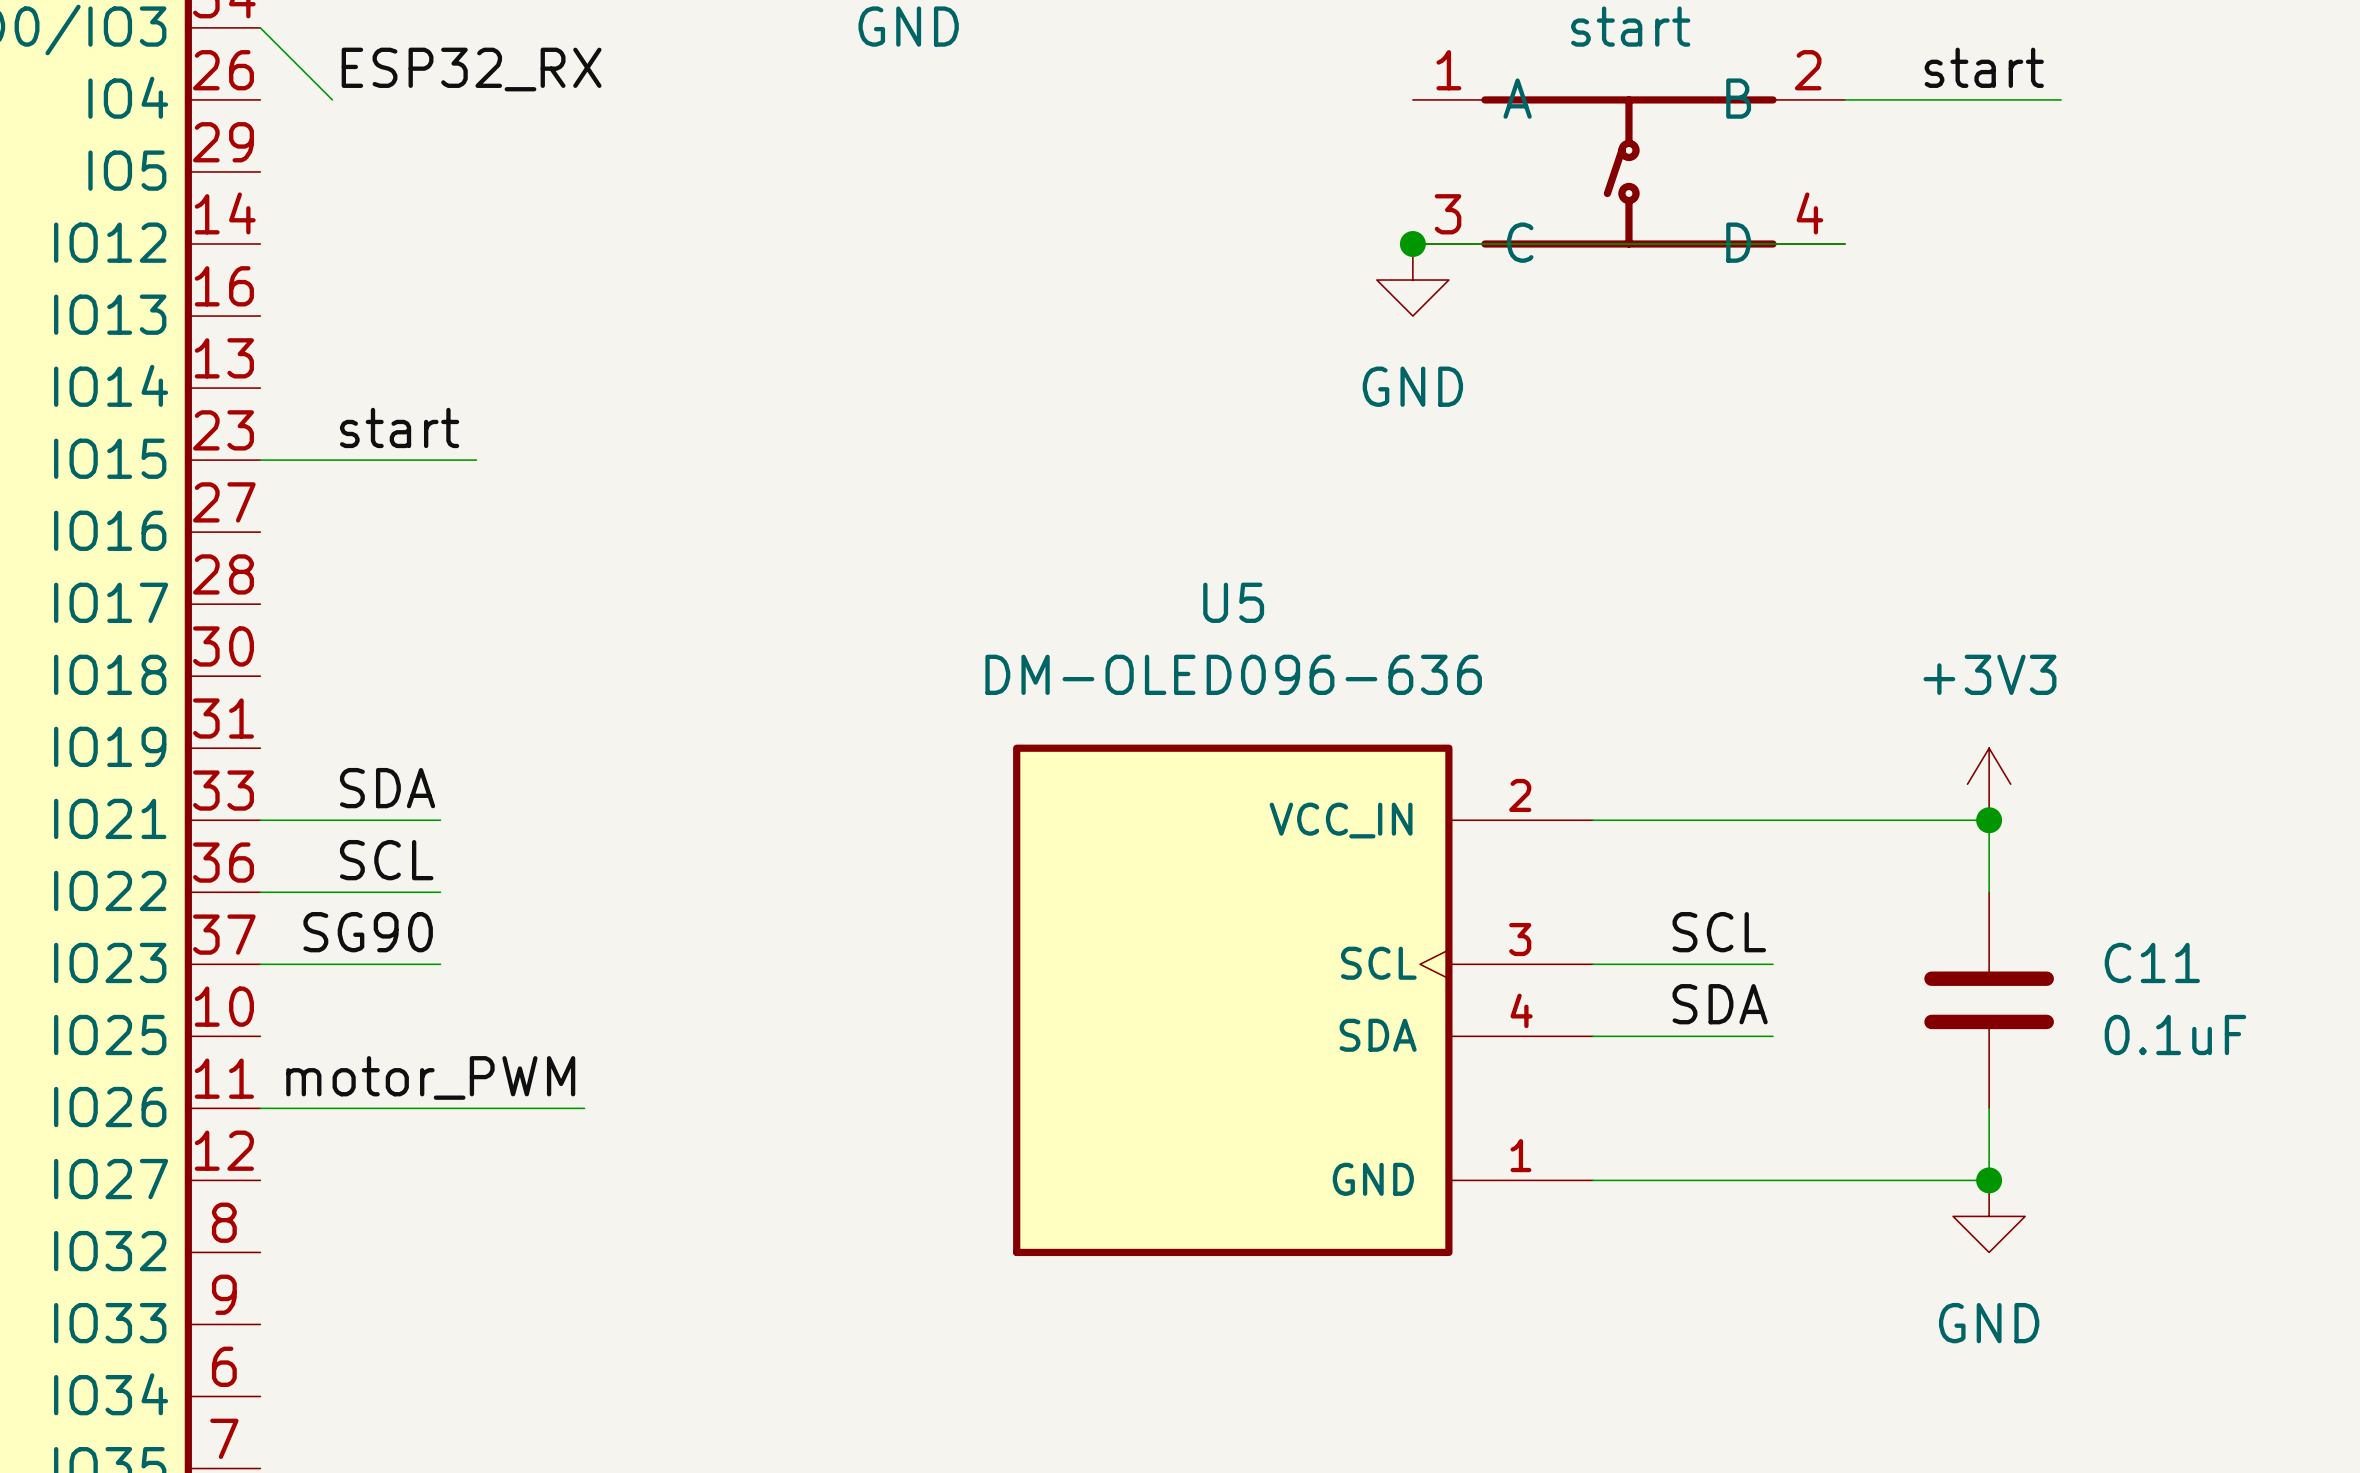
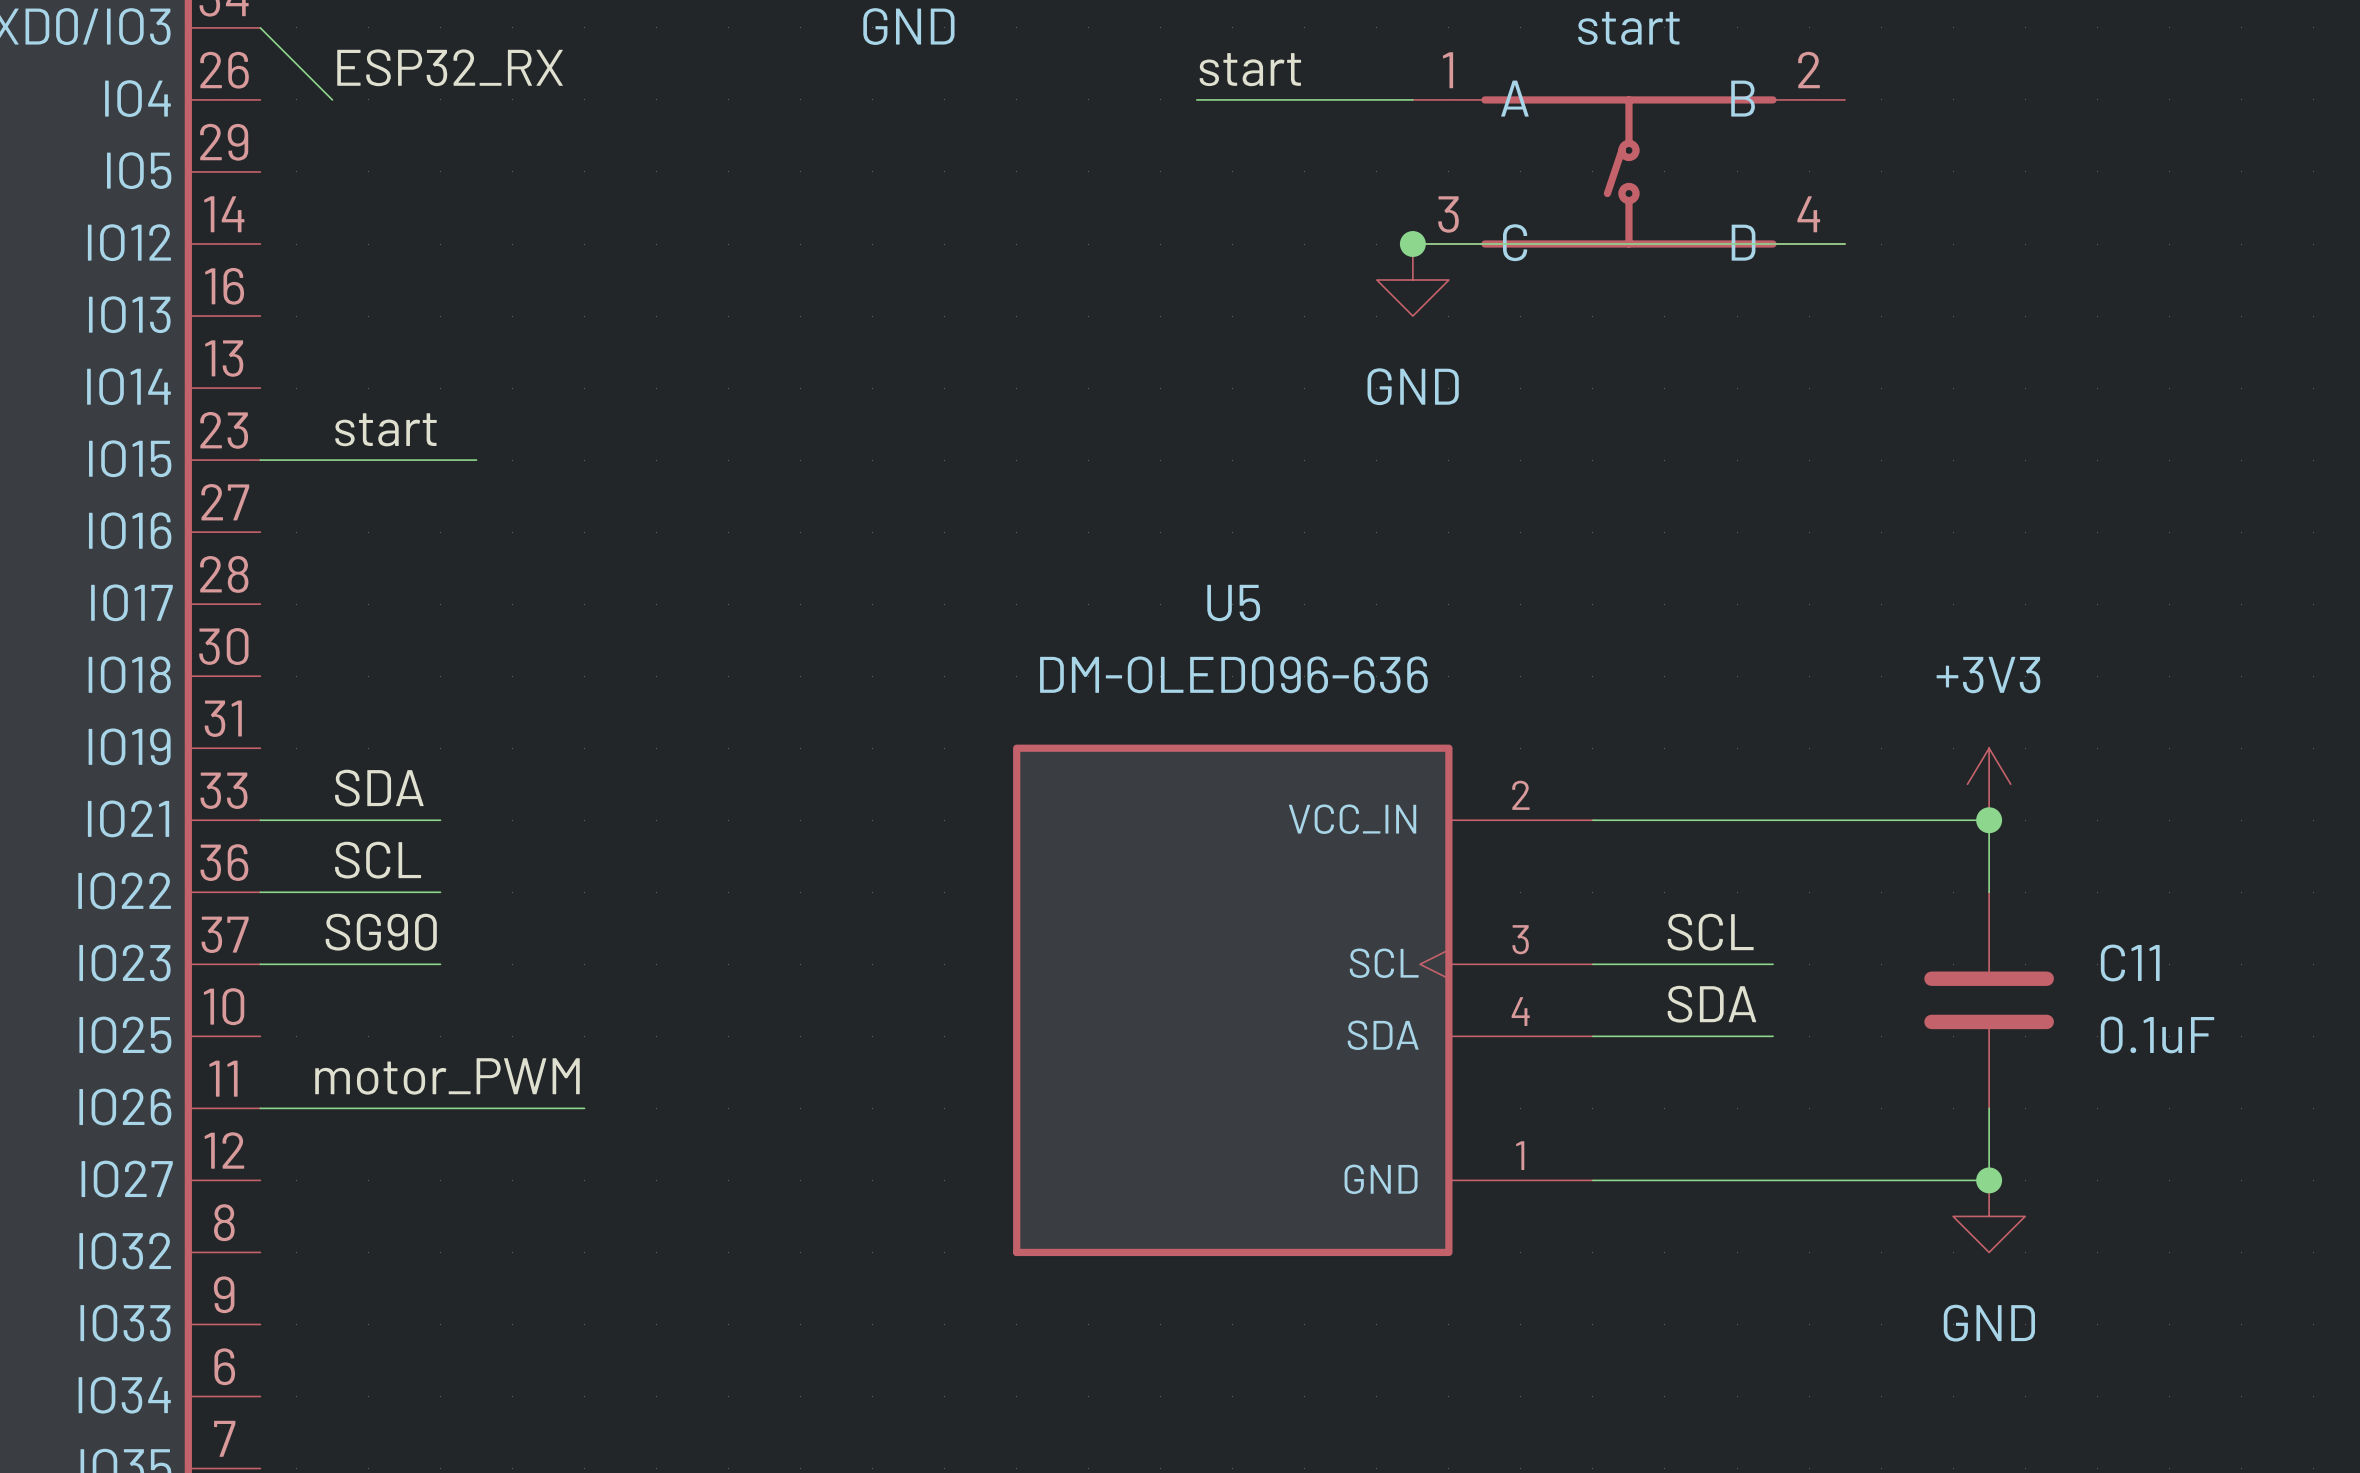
label: none -> start (1250, 69)
label: start (1984, 67) -> none
wire: (1845, 99) (2061, 99) -> (1196, 99) (1412, 99)

